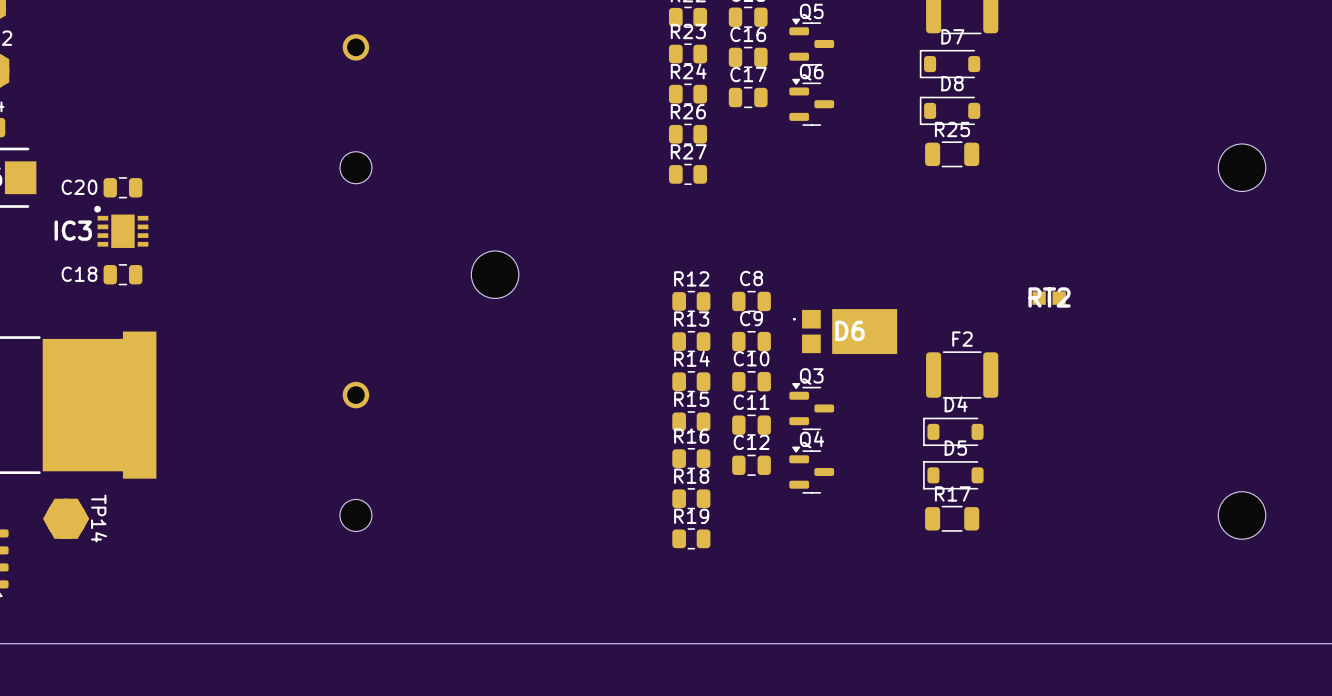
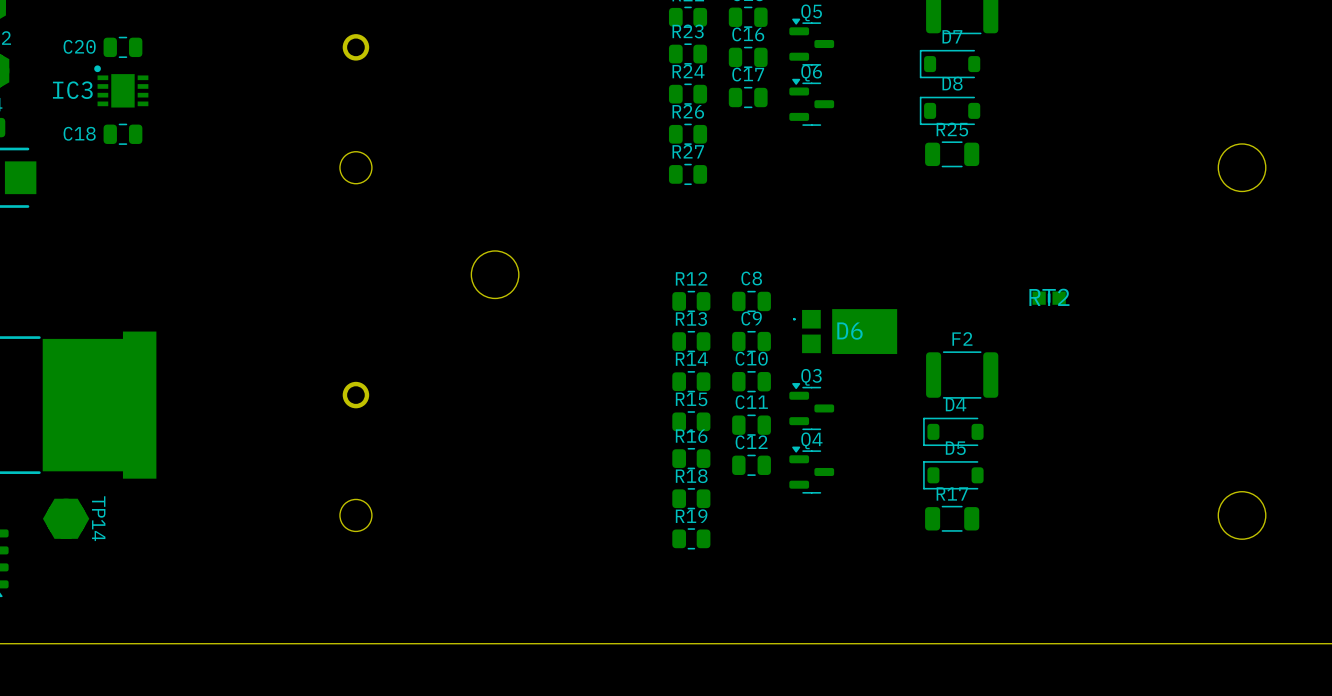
C20 position: (122, 187) -> (122, 47)
IC3 position: (121, 226) -> (121, 86)
C18 position: (122, 274) -> (122, 134)

